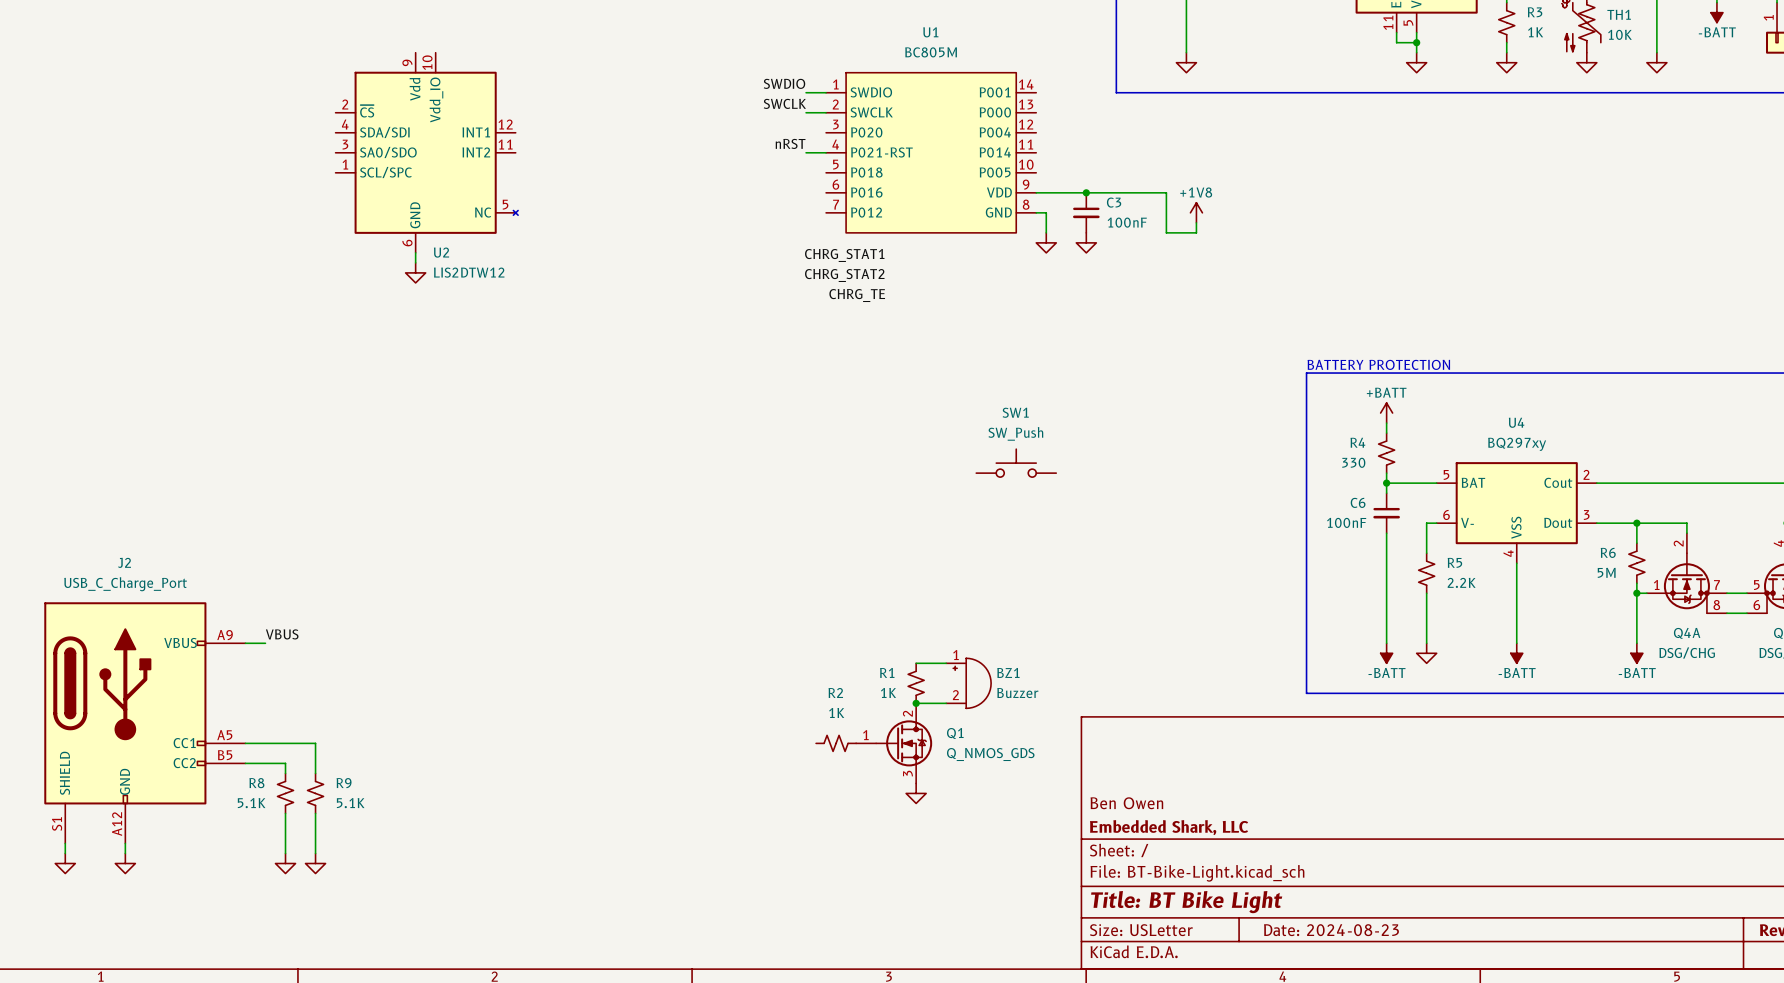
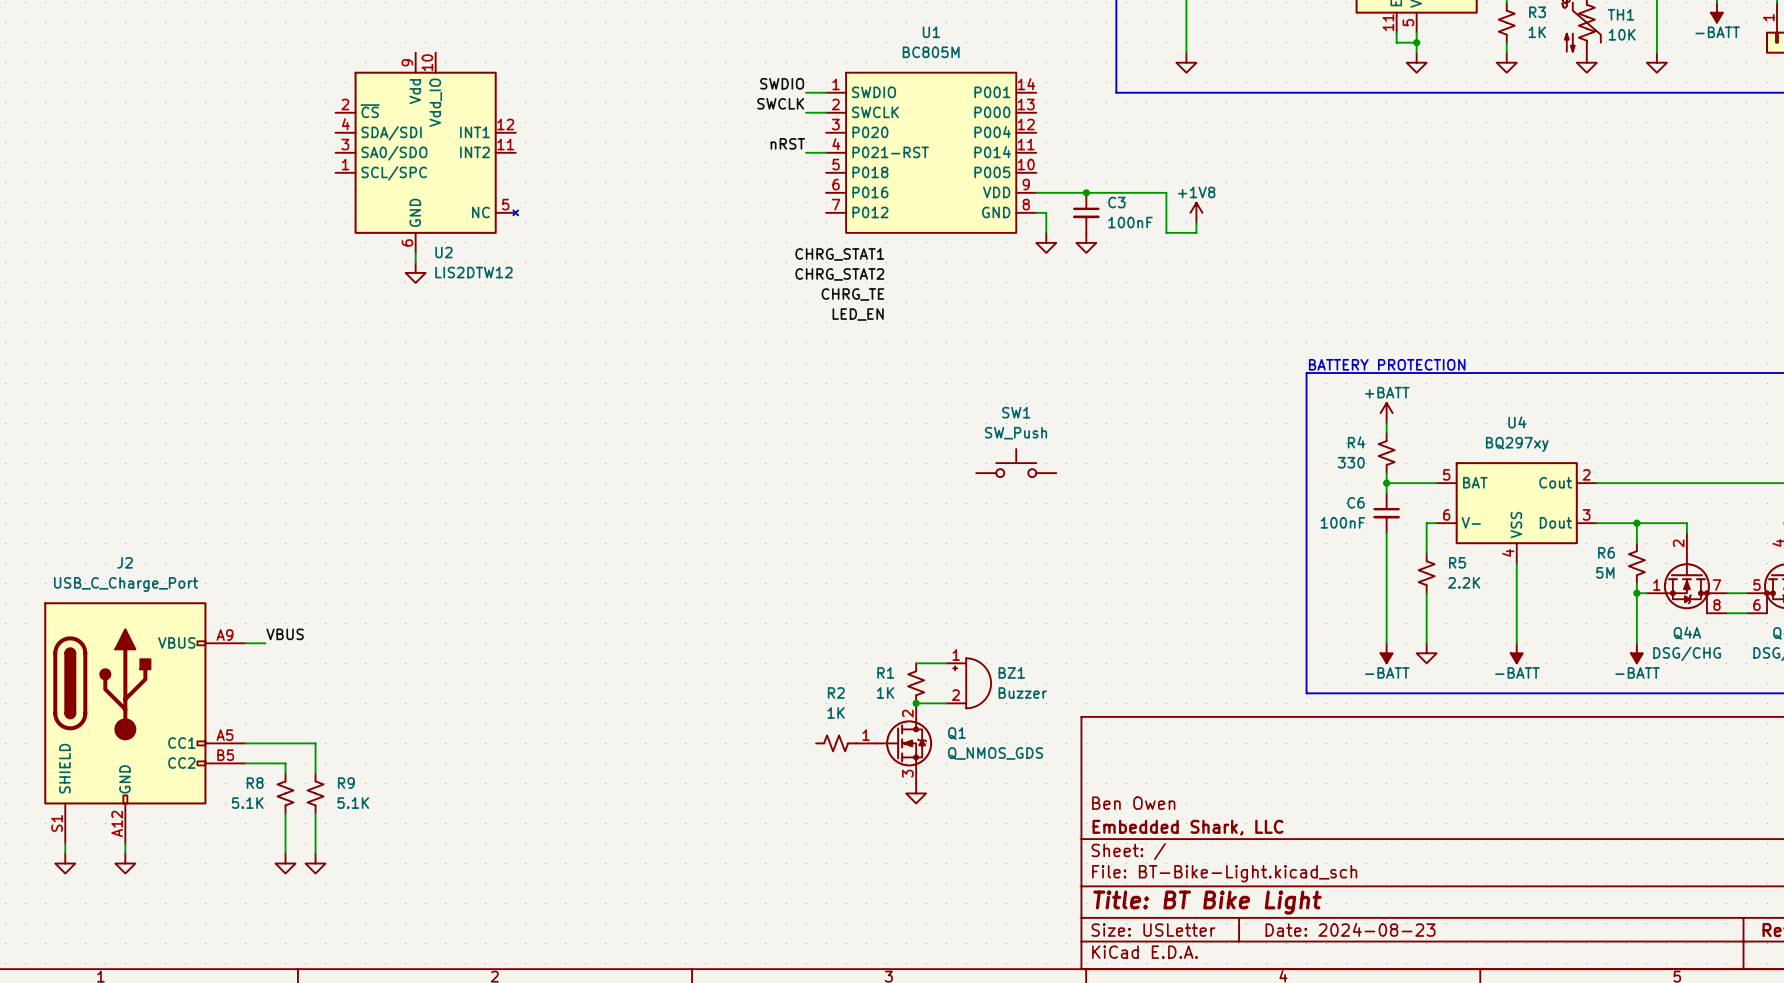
label: none -> LED_EN (858, 314)

